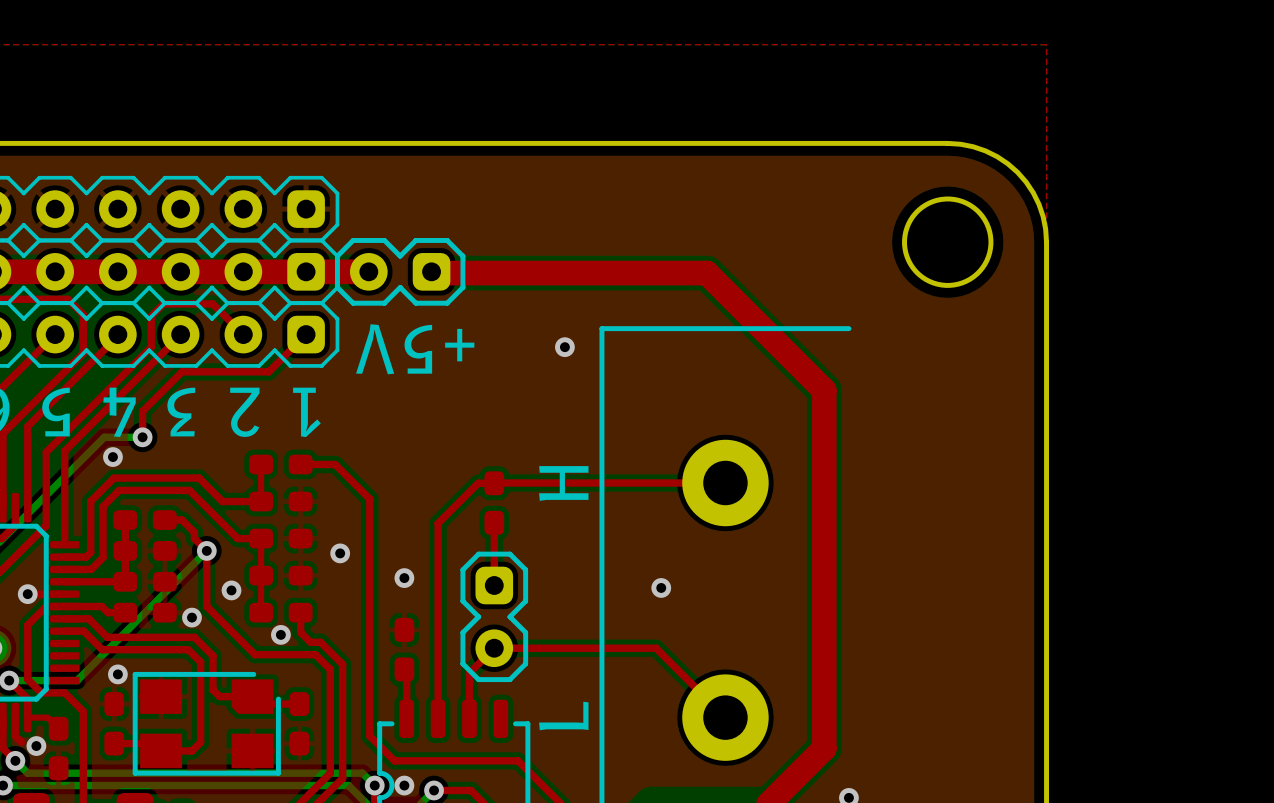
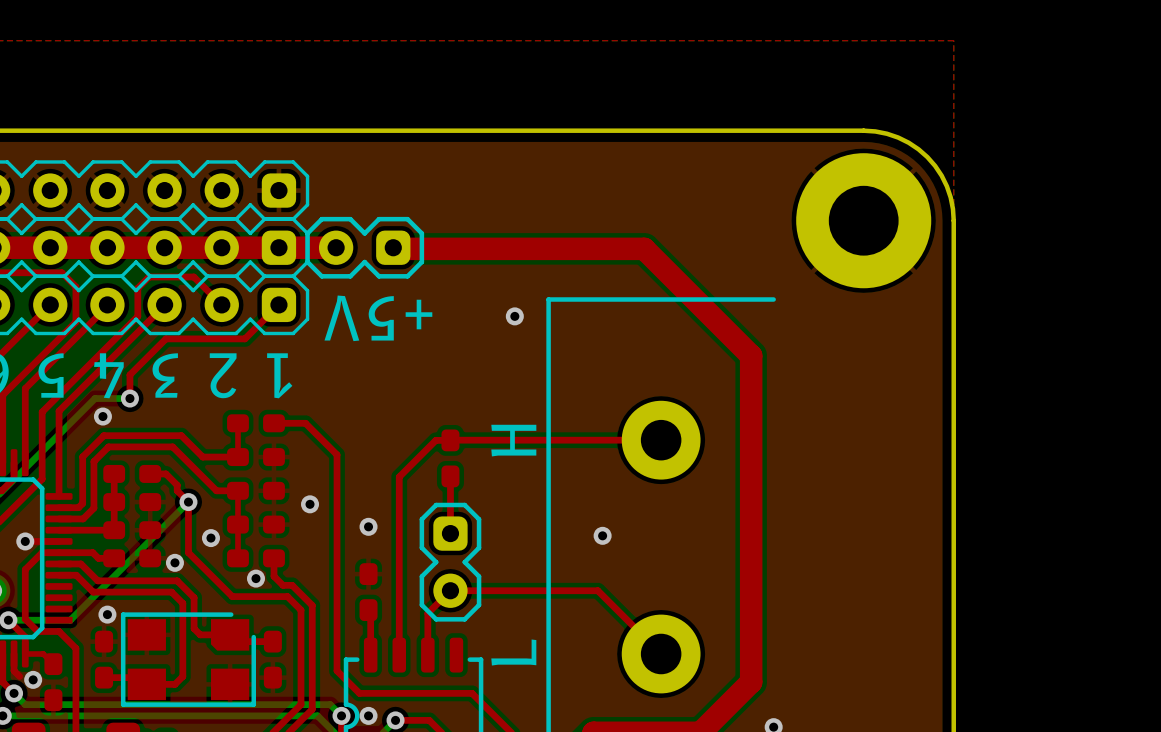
round board edge: [902, 196, 994, 288] -> none
part: none -> (863, 220)

